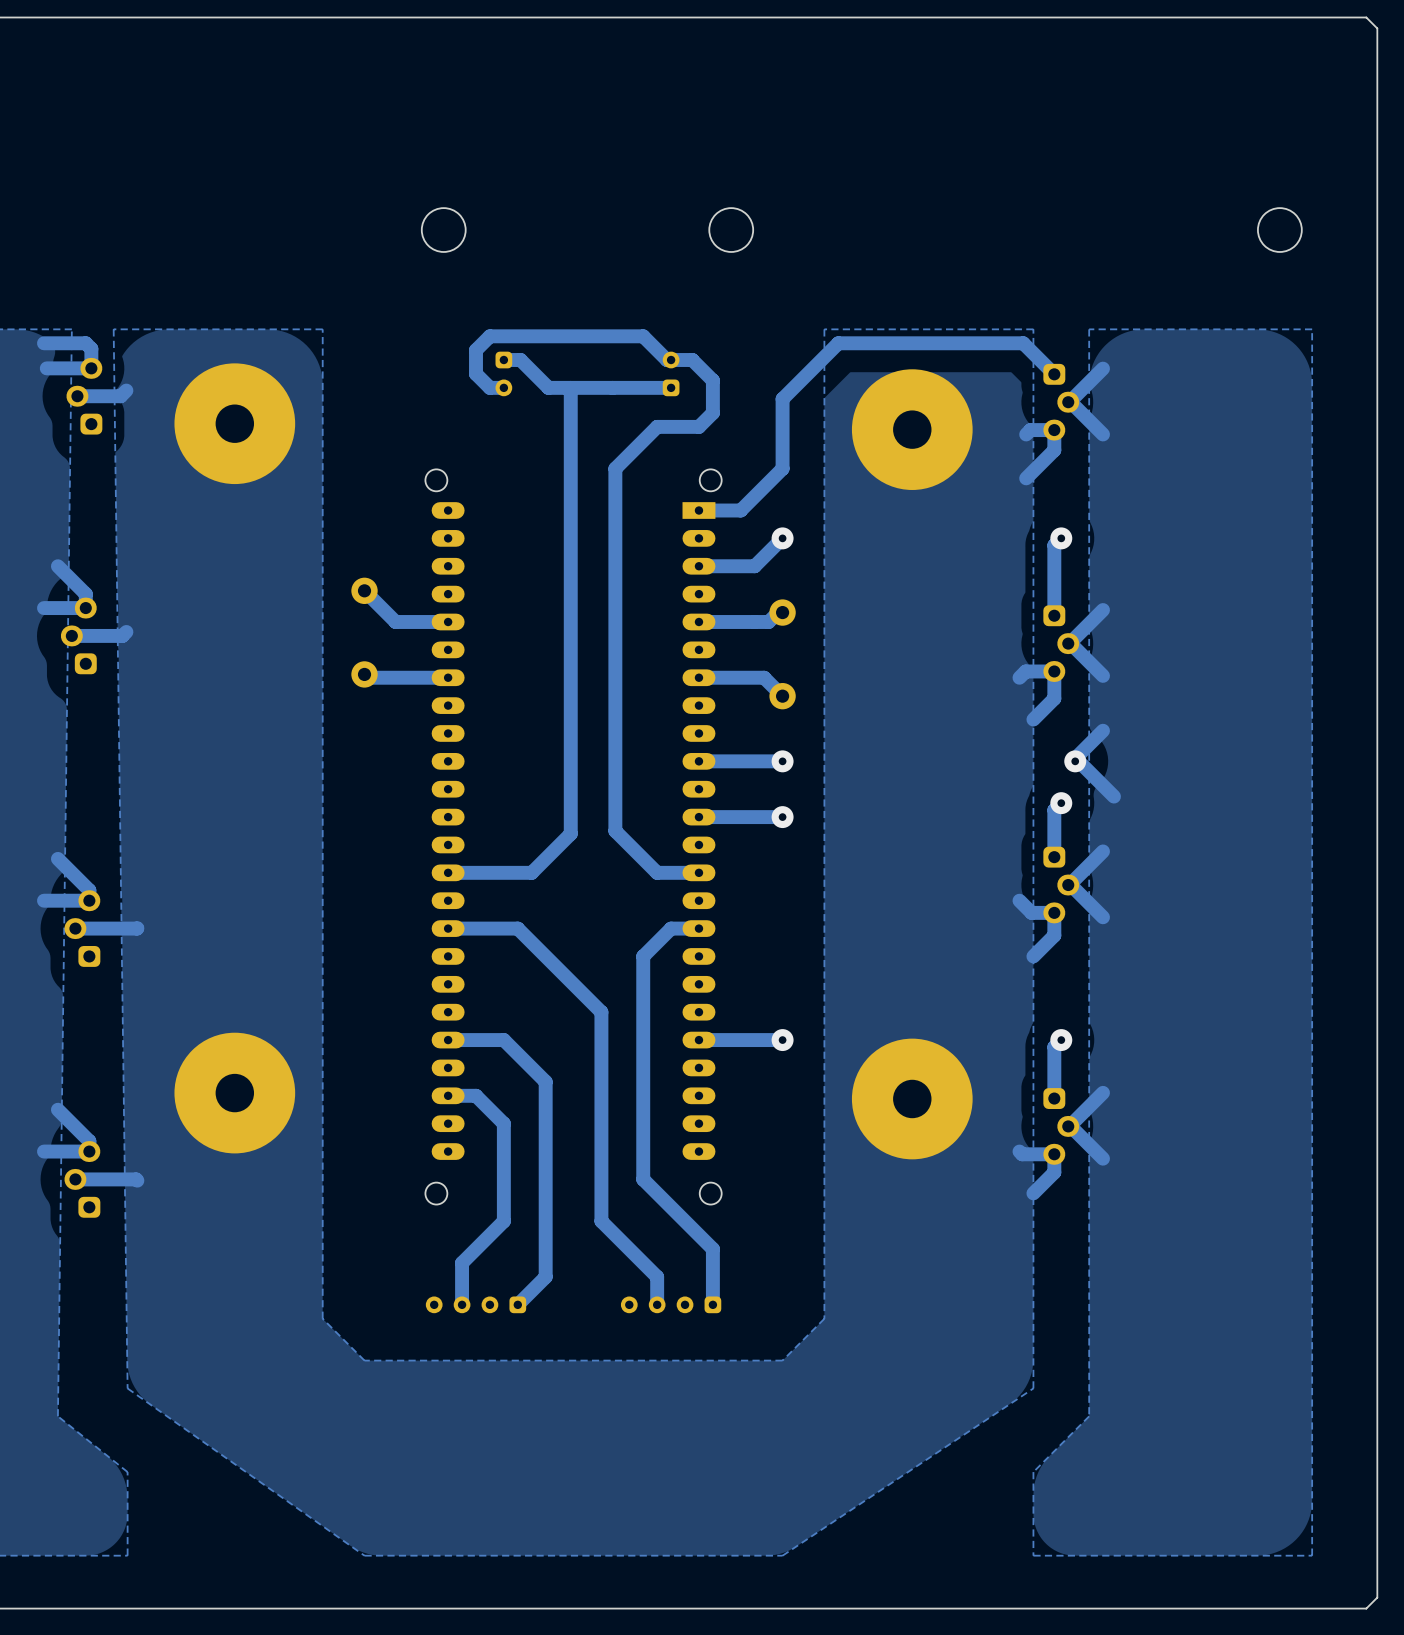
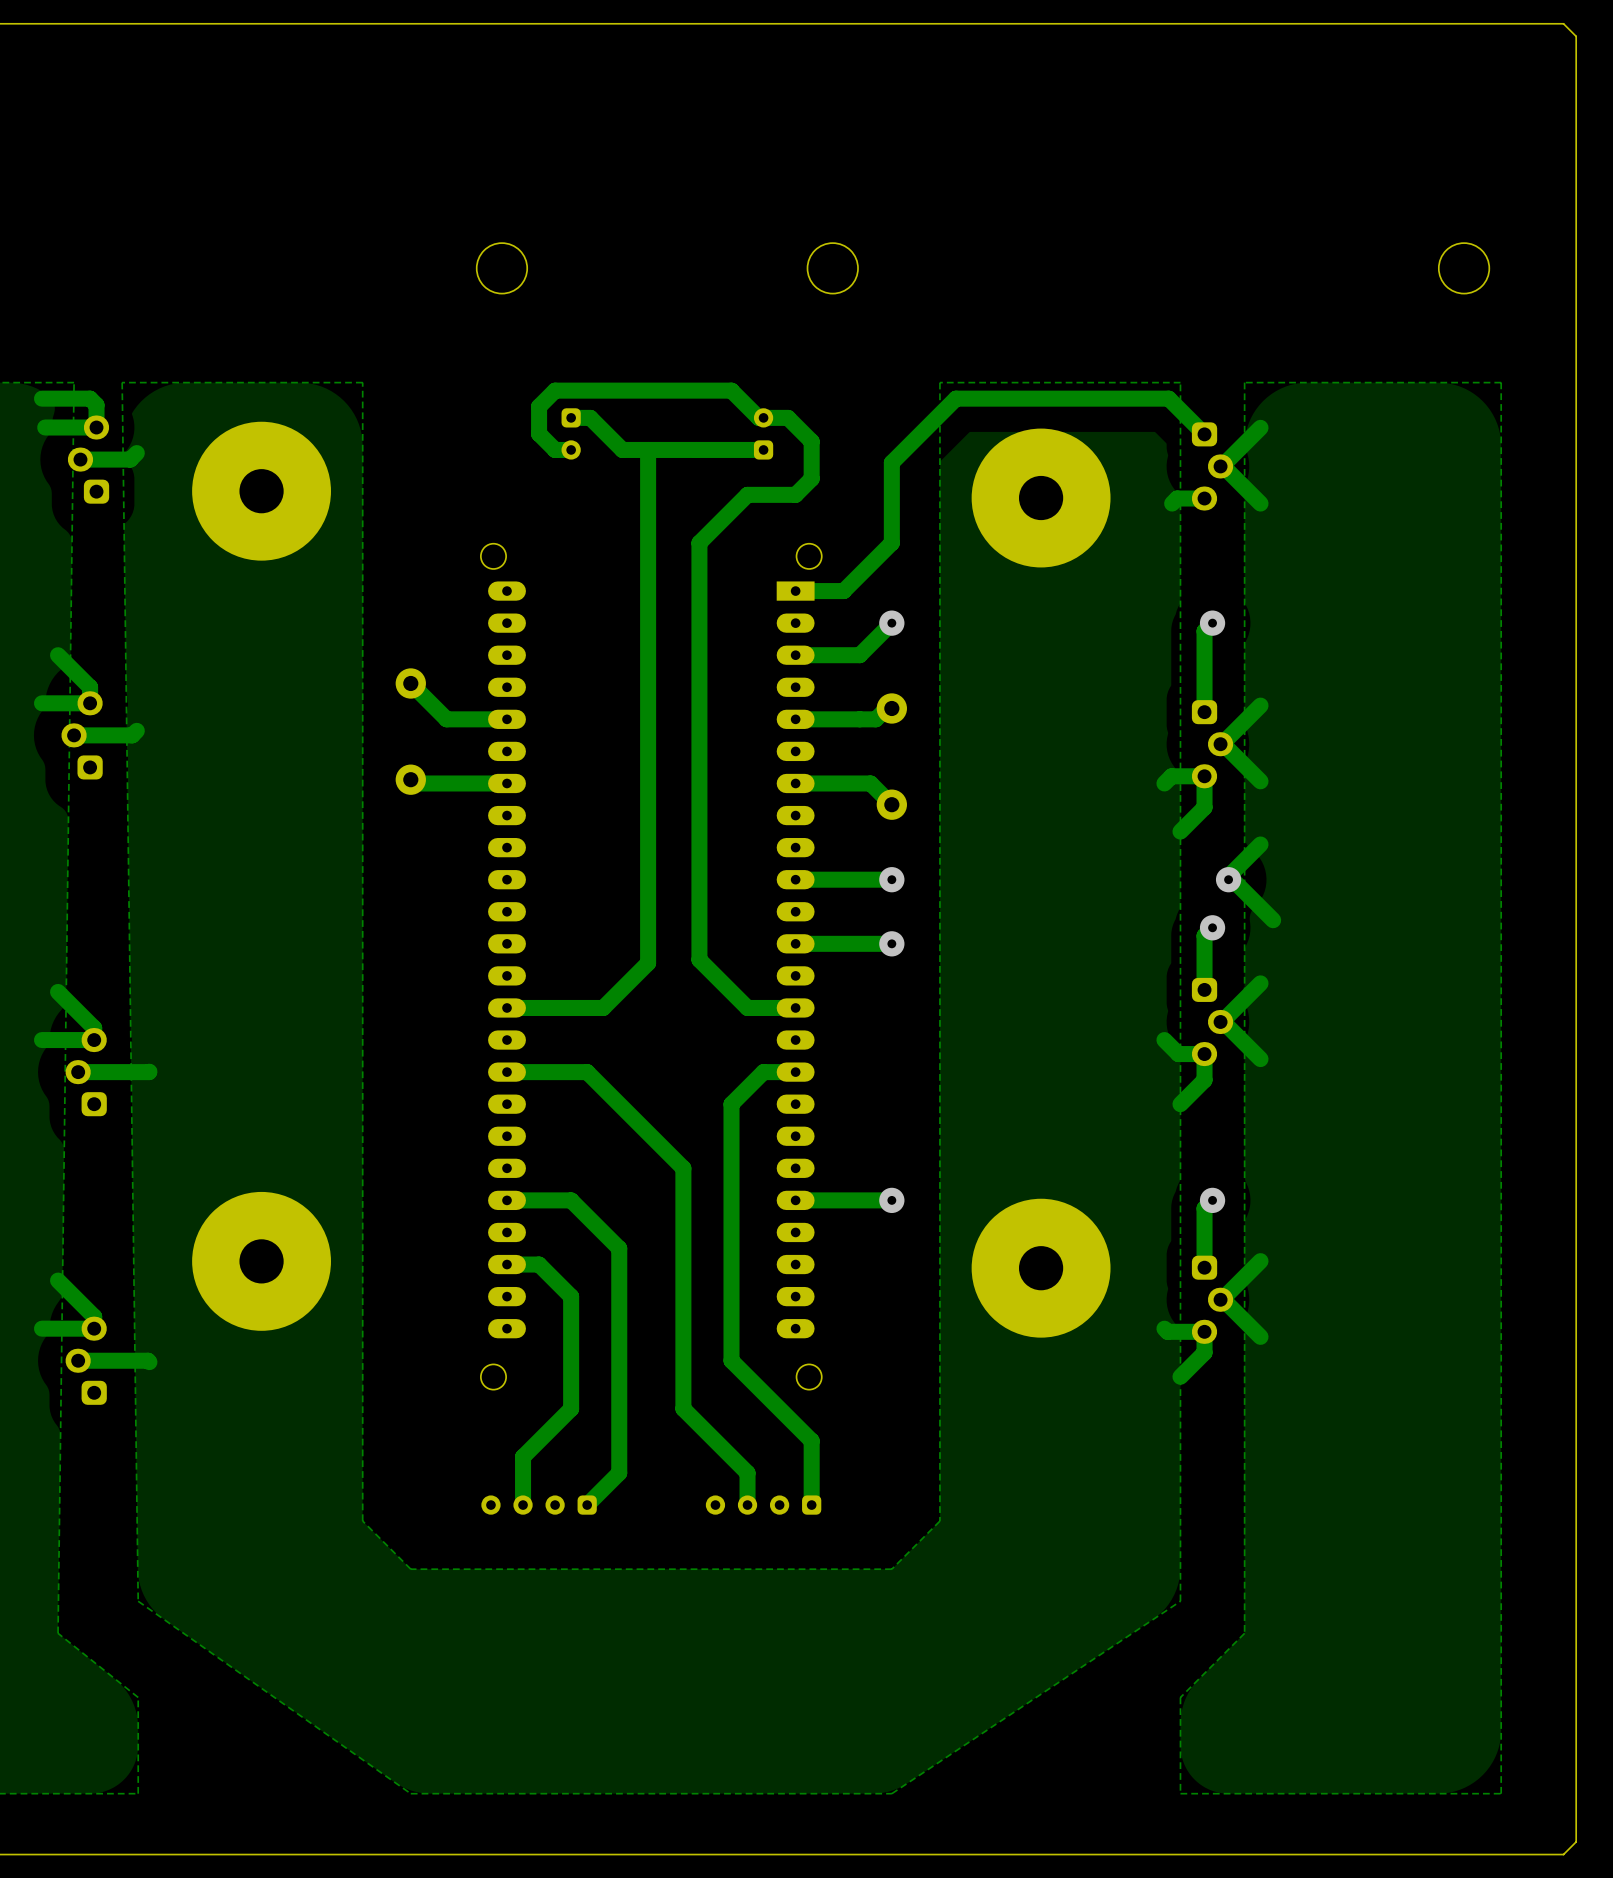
track: (1054, 430) (1054, 450) (1026, 478) -> none

